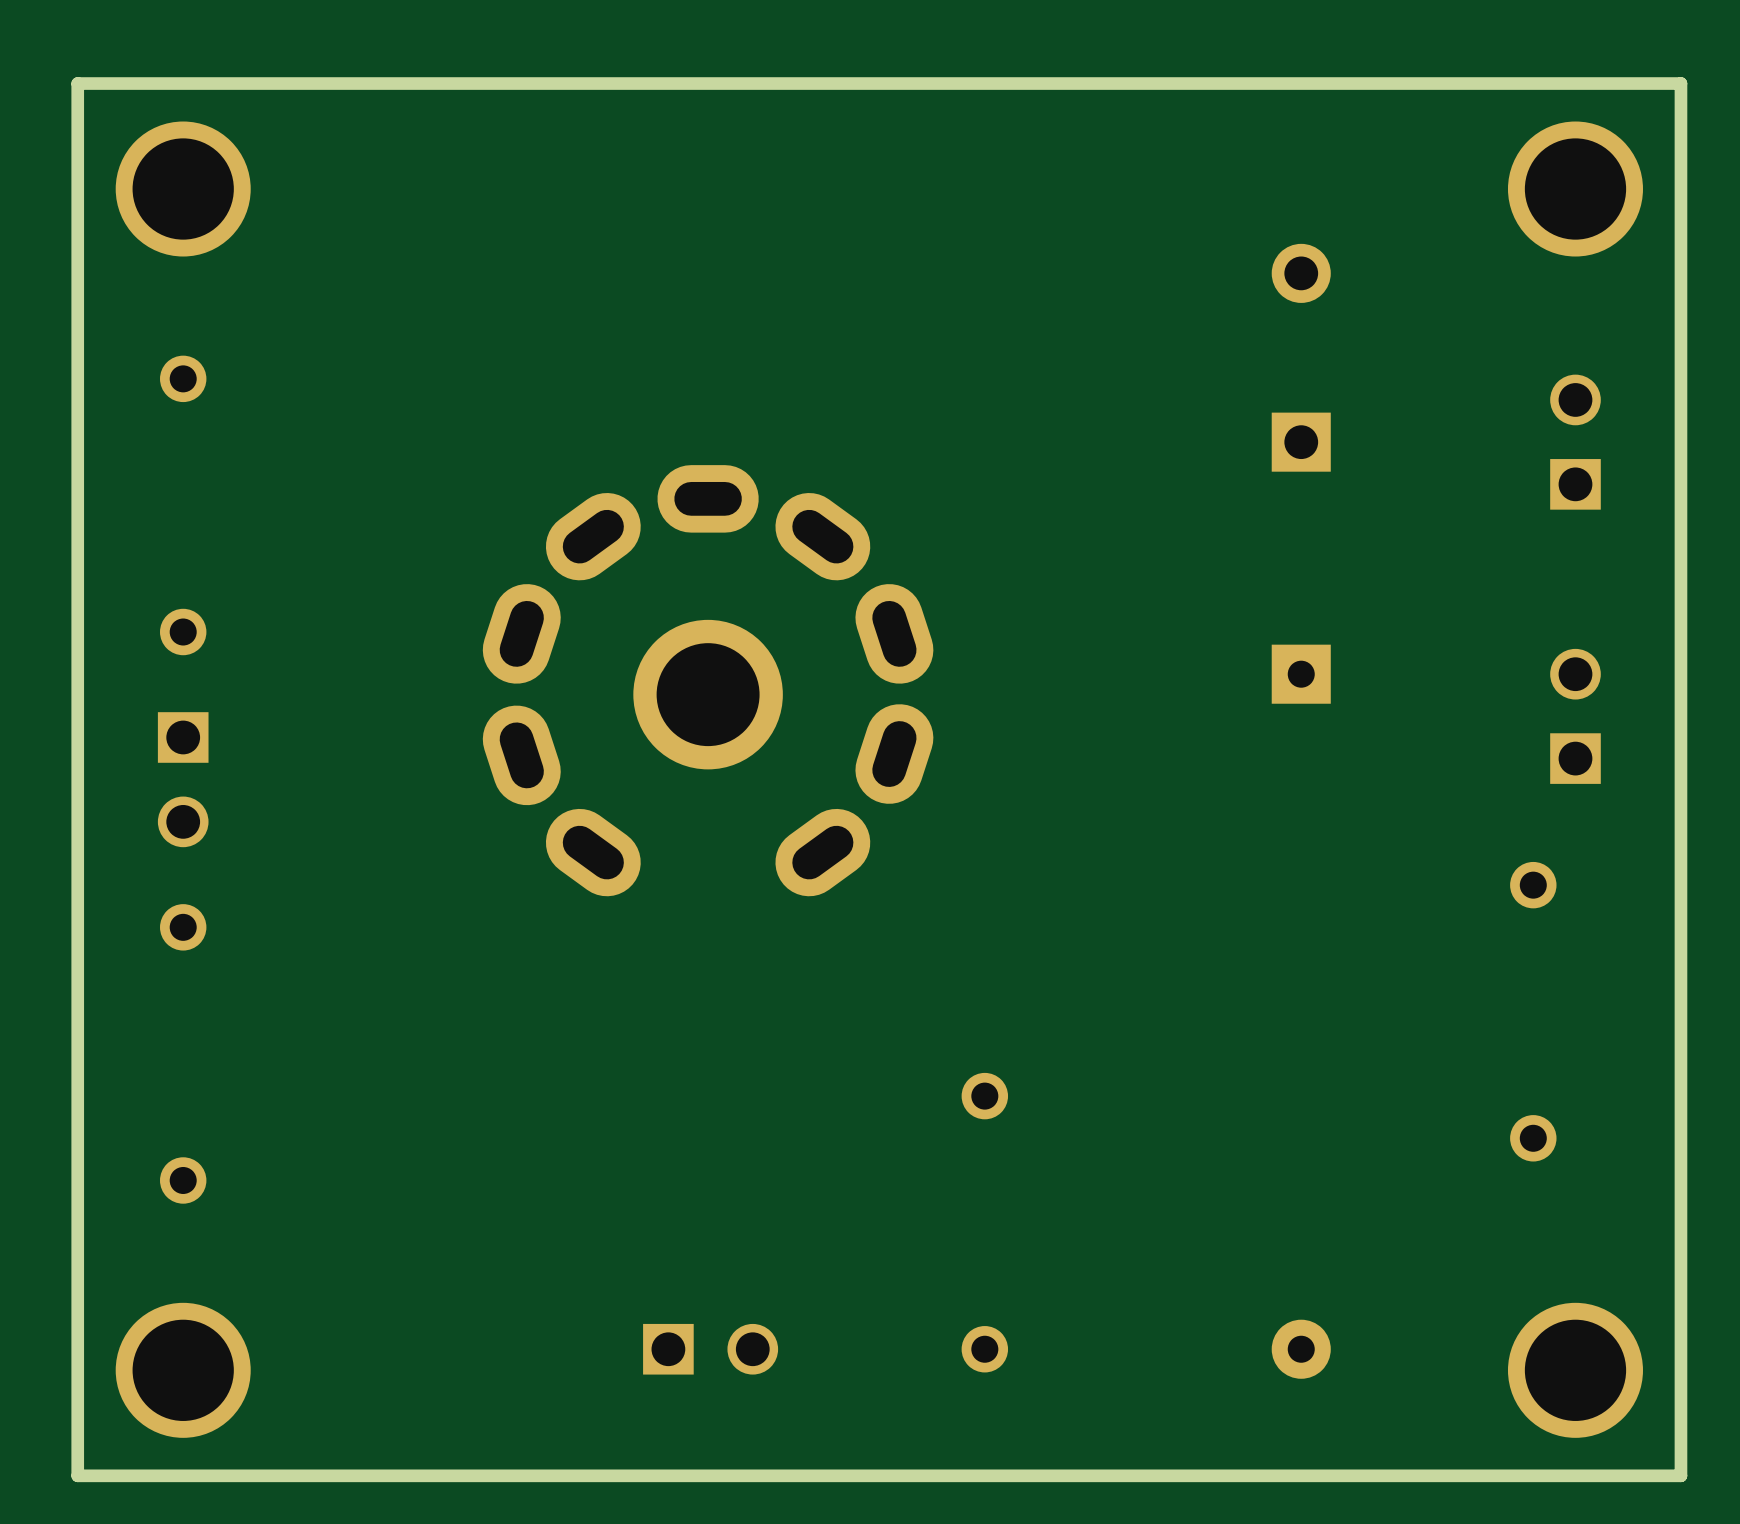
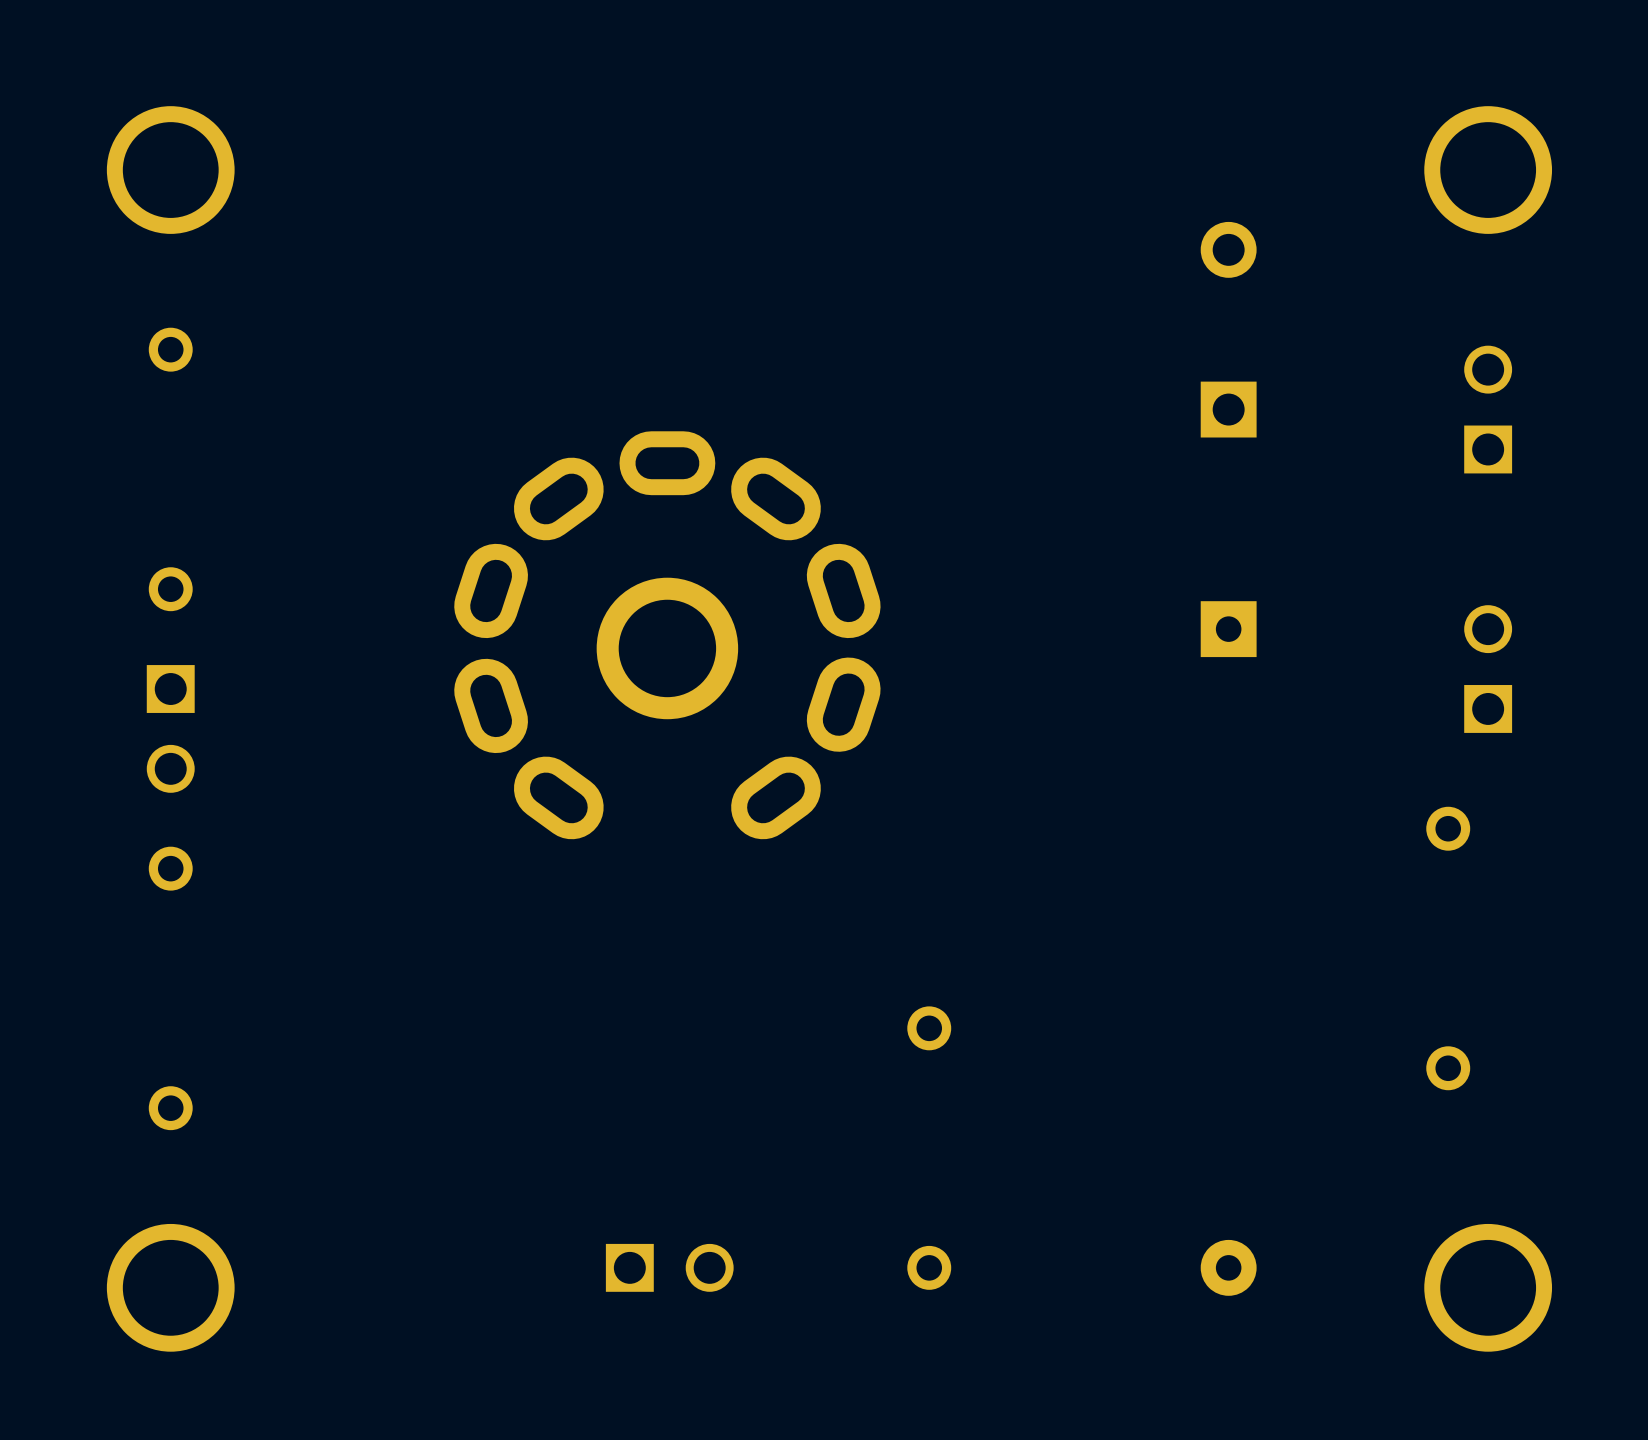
board edge: (1680, 83) (77, 83) (77, 1475) (1680, 1475) (1680, 83) -> none

